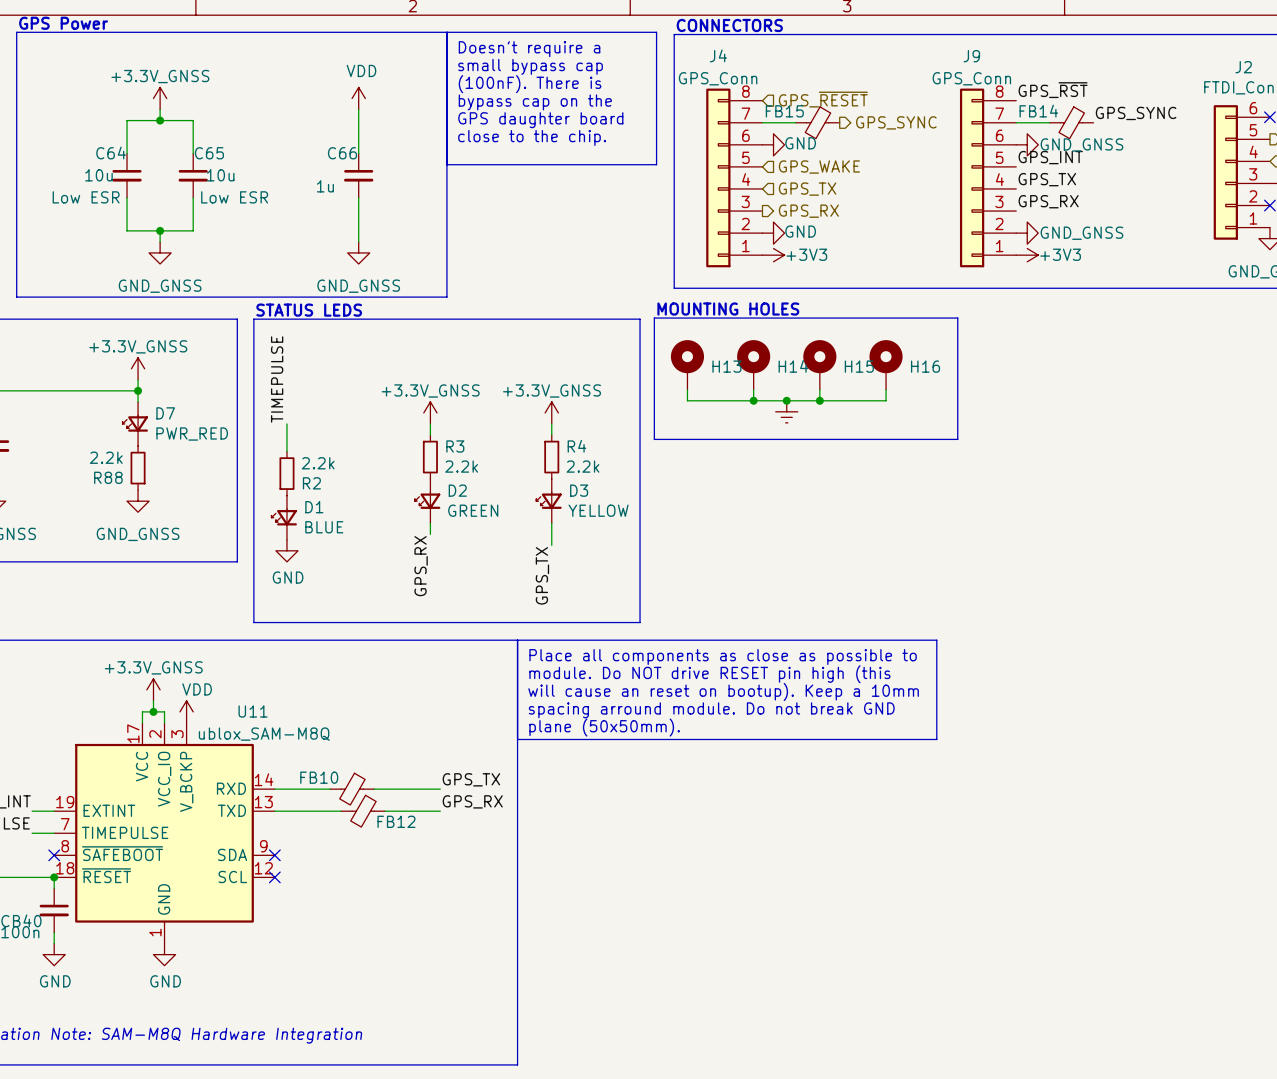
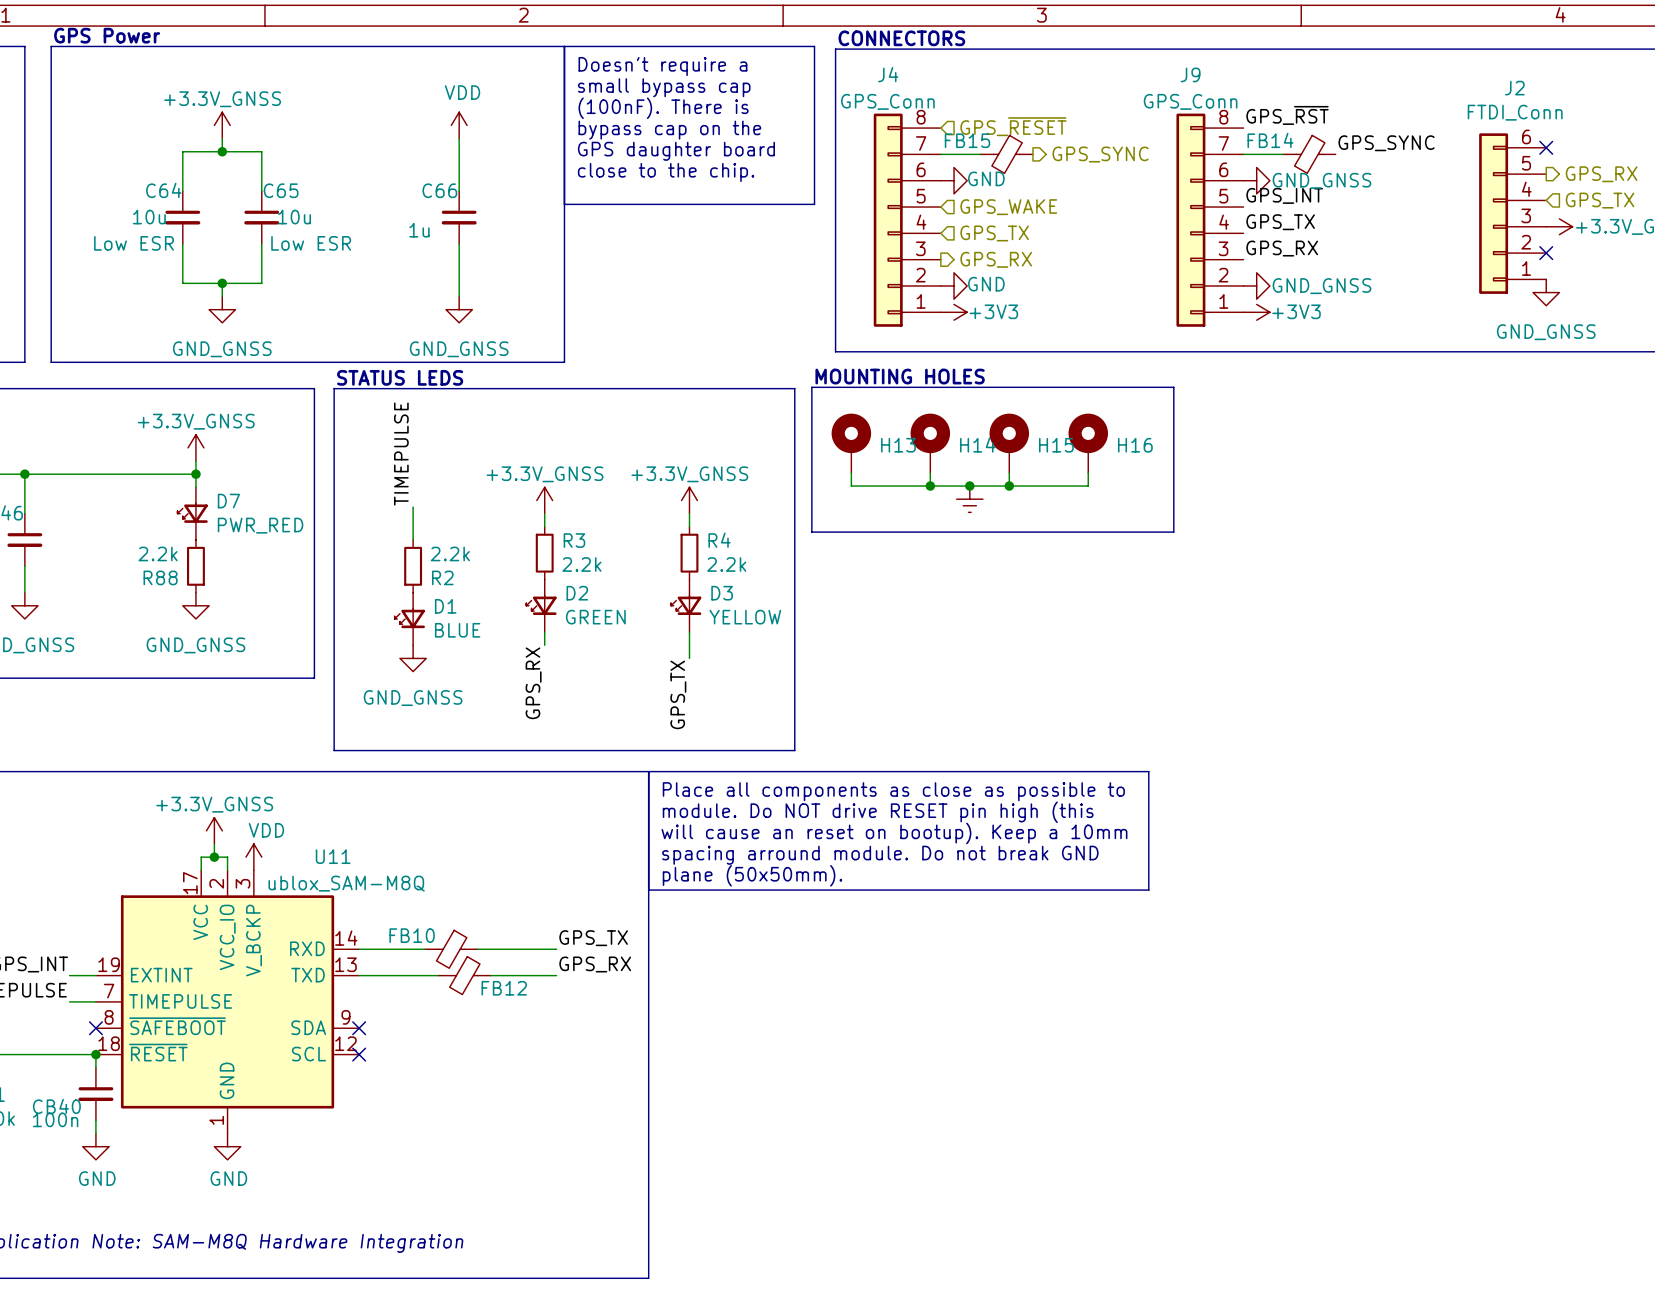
label position: TIMEPULSE (277, 379) -> TIMEPULSE (401, 454)
wire: (286, 423) (286, 451) -> (413, 507) (413, 539)
R2 position: (286, 473) -> (413, 566)
D1 position: (284, 517) -> (409, 618)
power symbol: none -> GND_GNSS (413, 658)
power symbol: GND (286, 550) -> none

